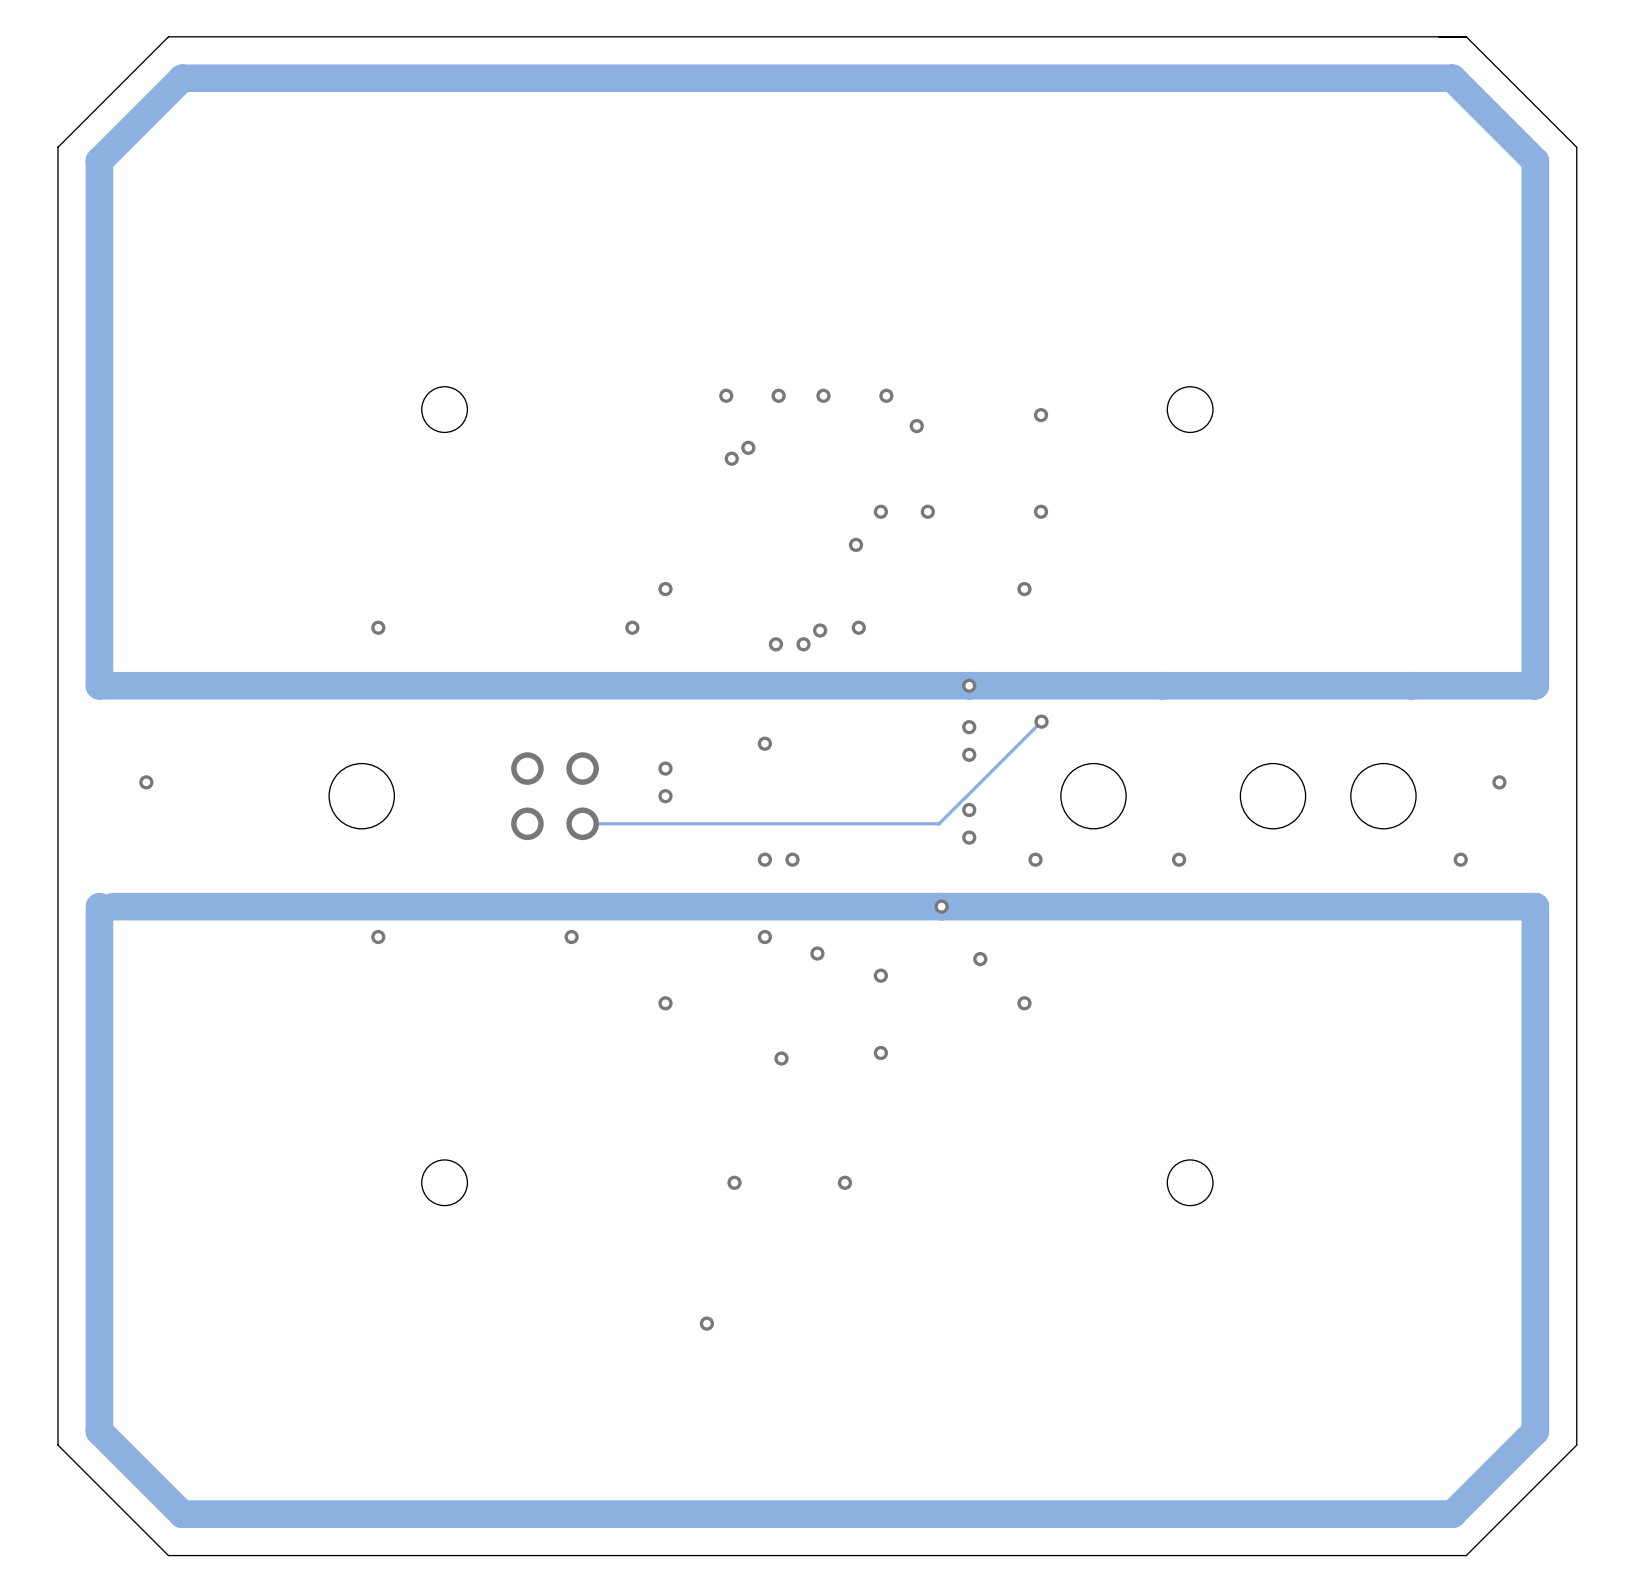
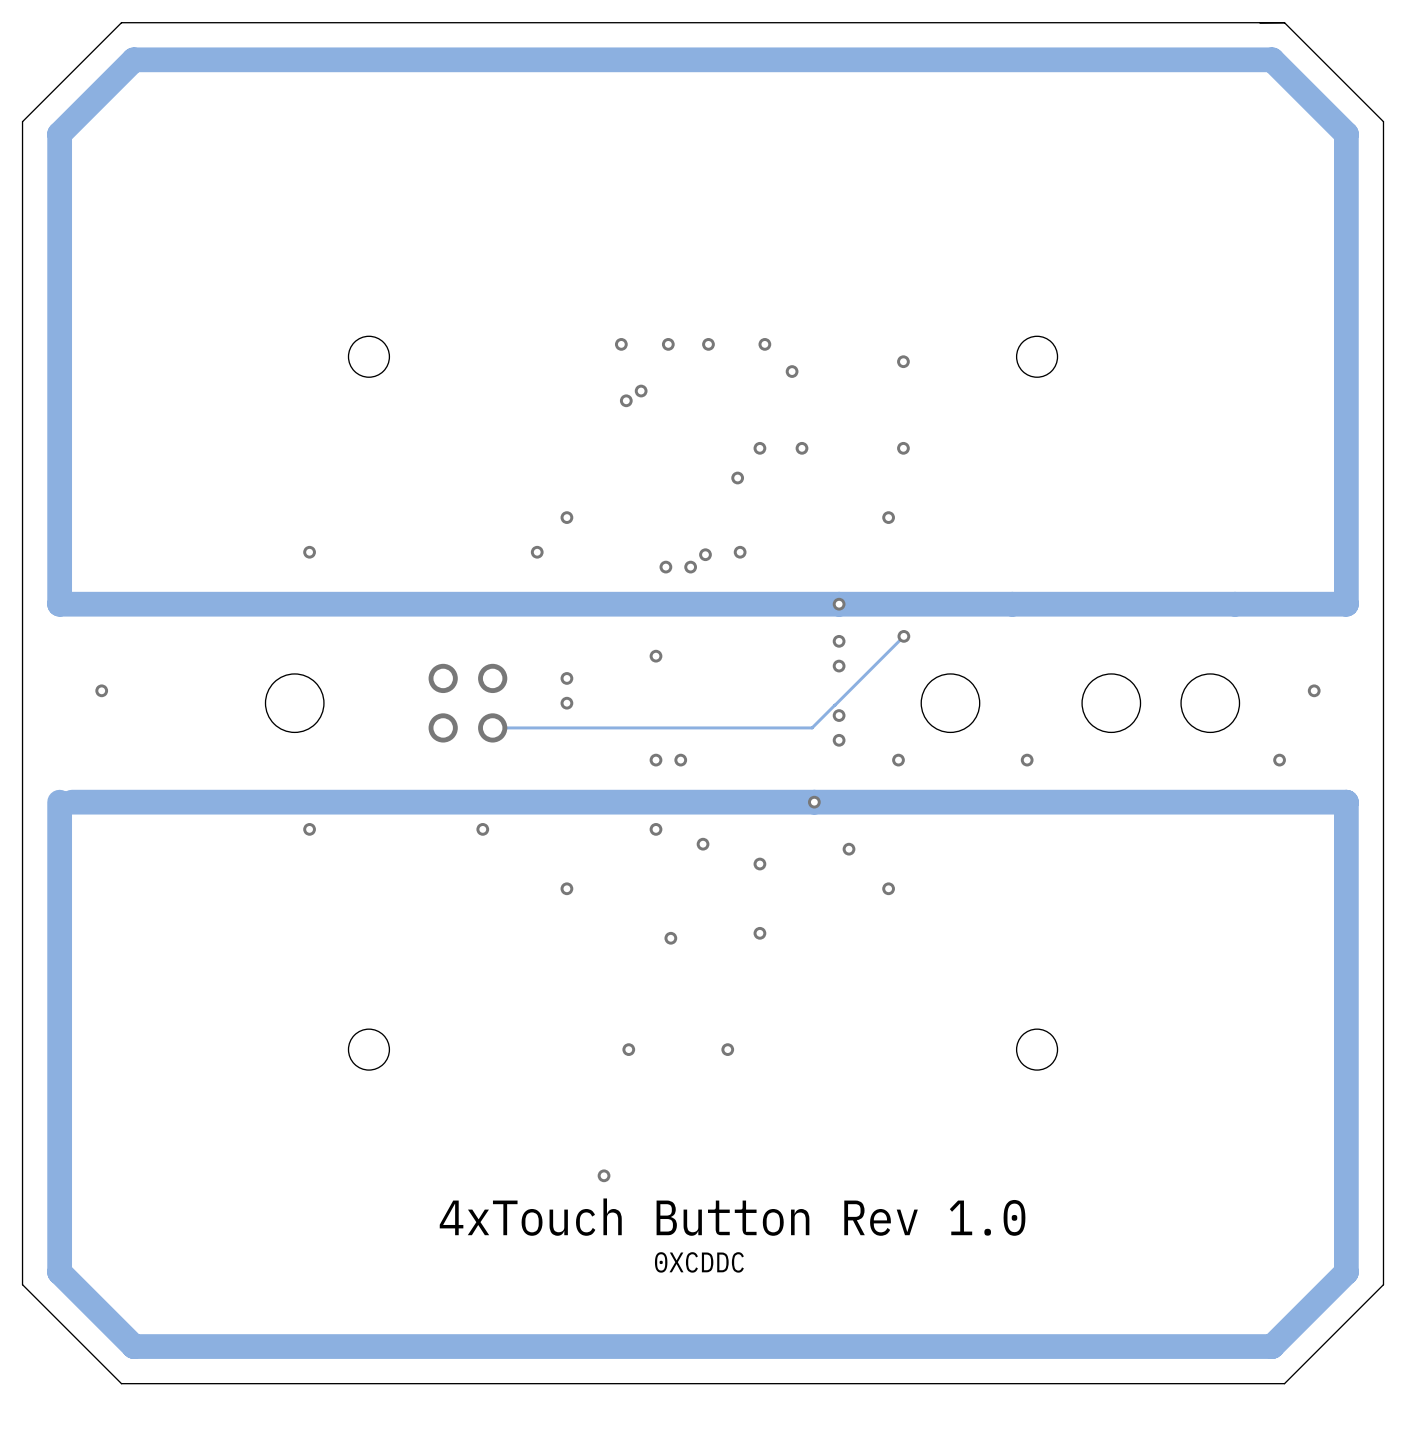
text: none -> 4xTouch Button Rev 1.0 (732, 1217)
text: none -> 0XCDDC (699, 1262)

